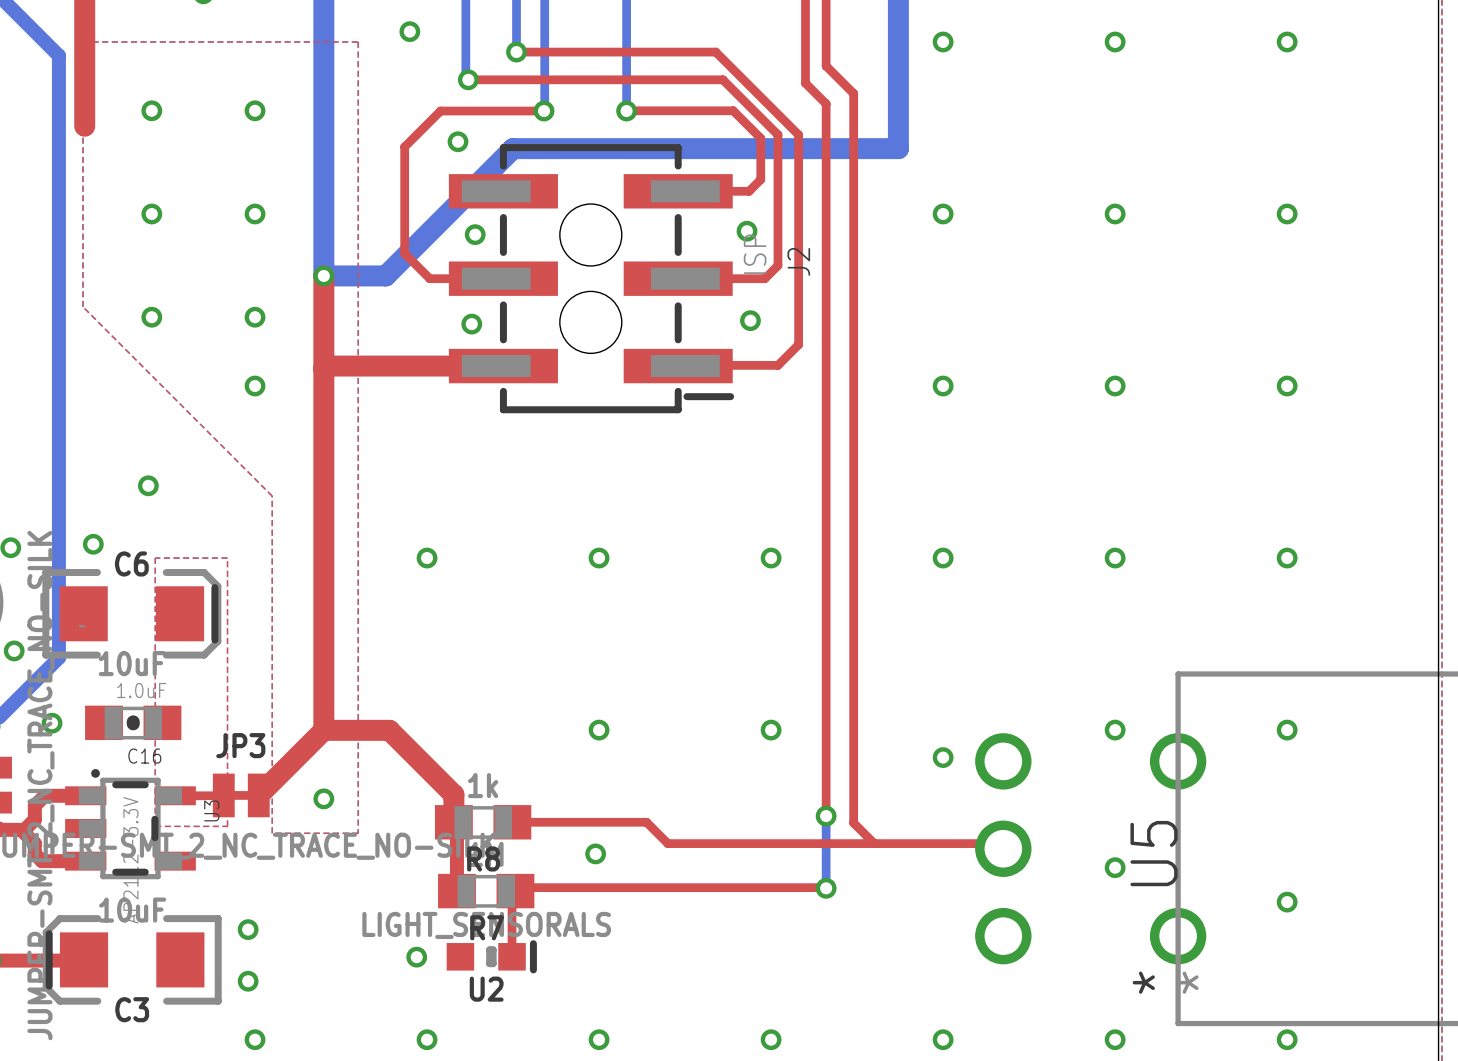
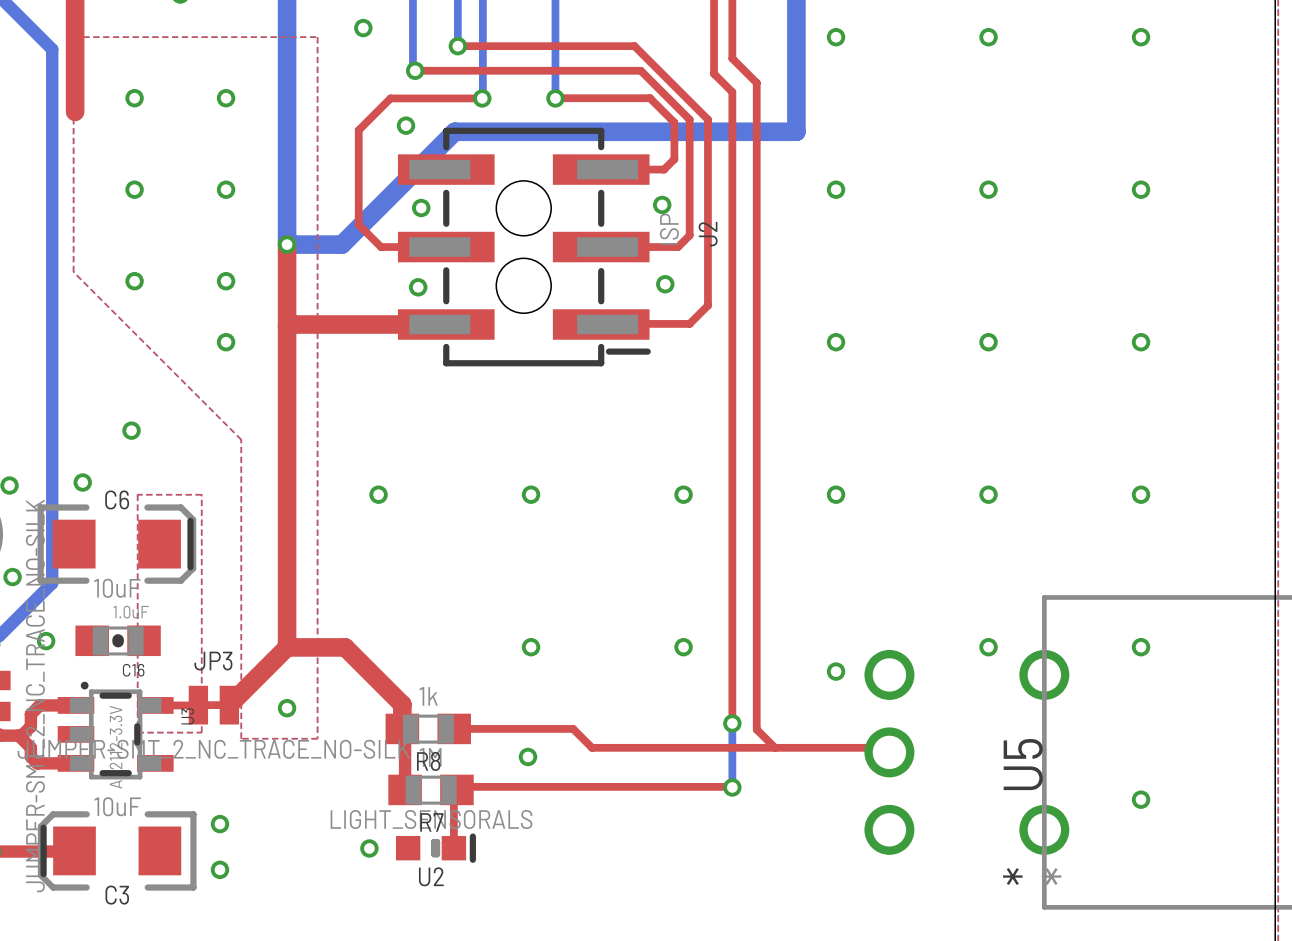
via: (1115, 867) -> none
via: (255, 1039) -> none
via: (427, 1039) -> none
via: (599, 1039) -> none
via: (771, 1039) -> none
via: (943, 1039) -> none
via: (1115, 1039) -> none
via: (1287, 1039) -> none

